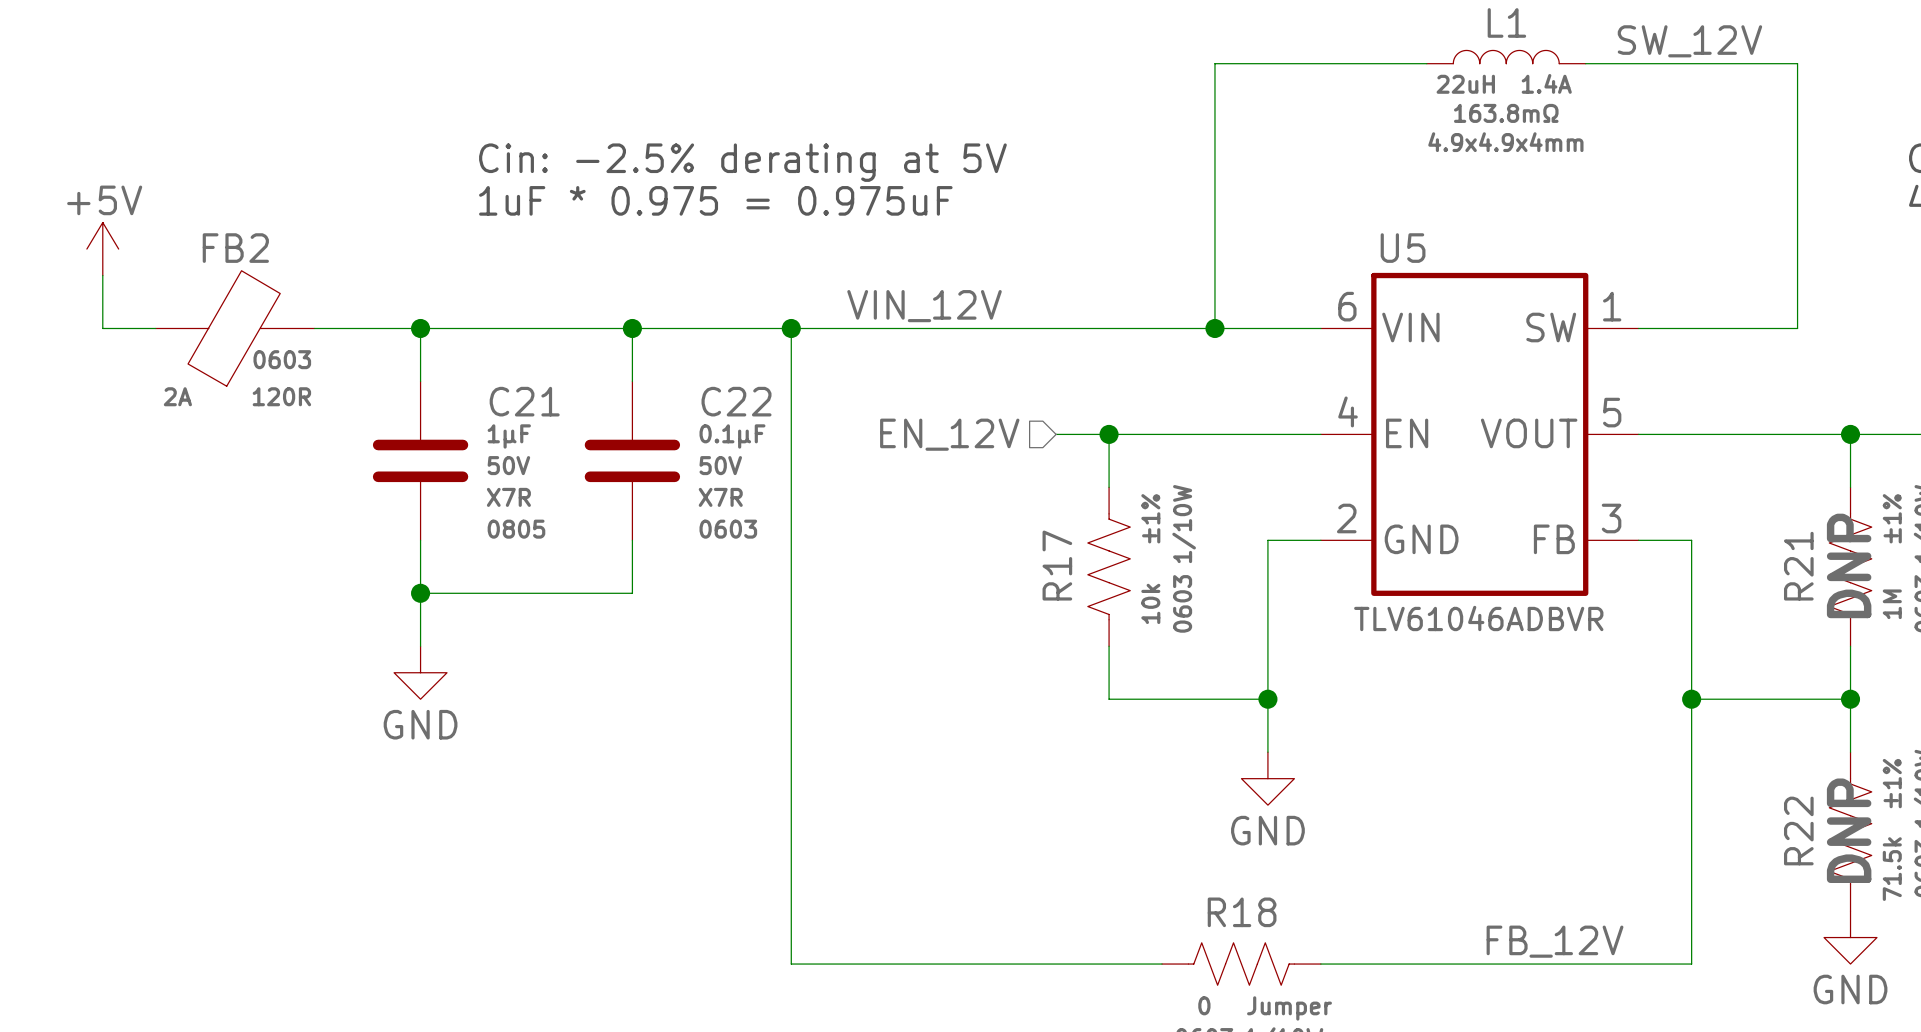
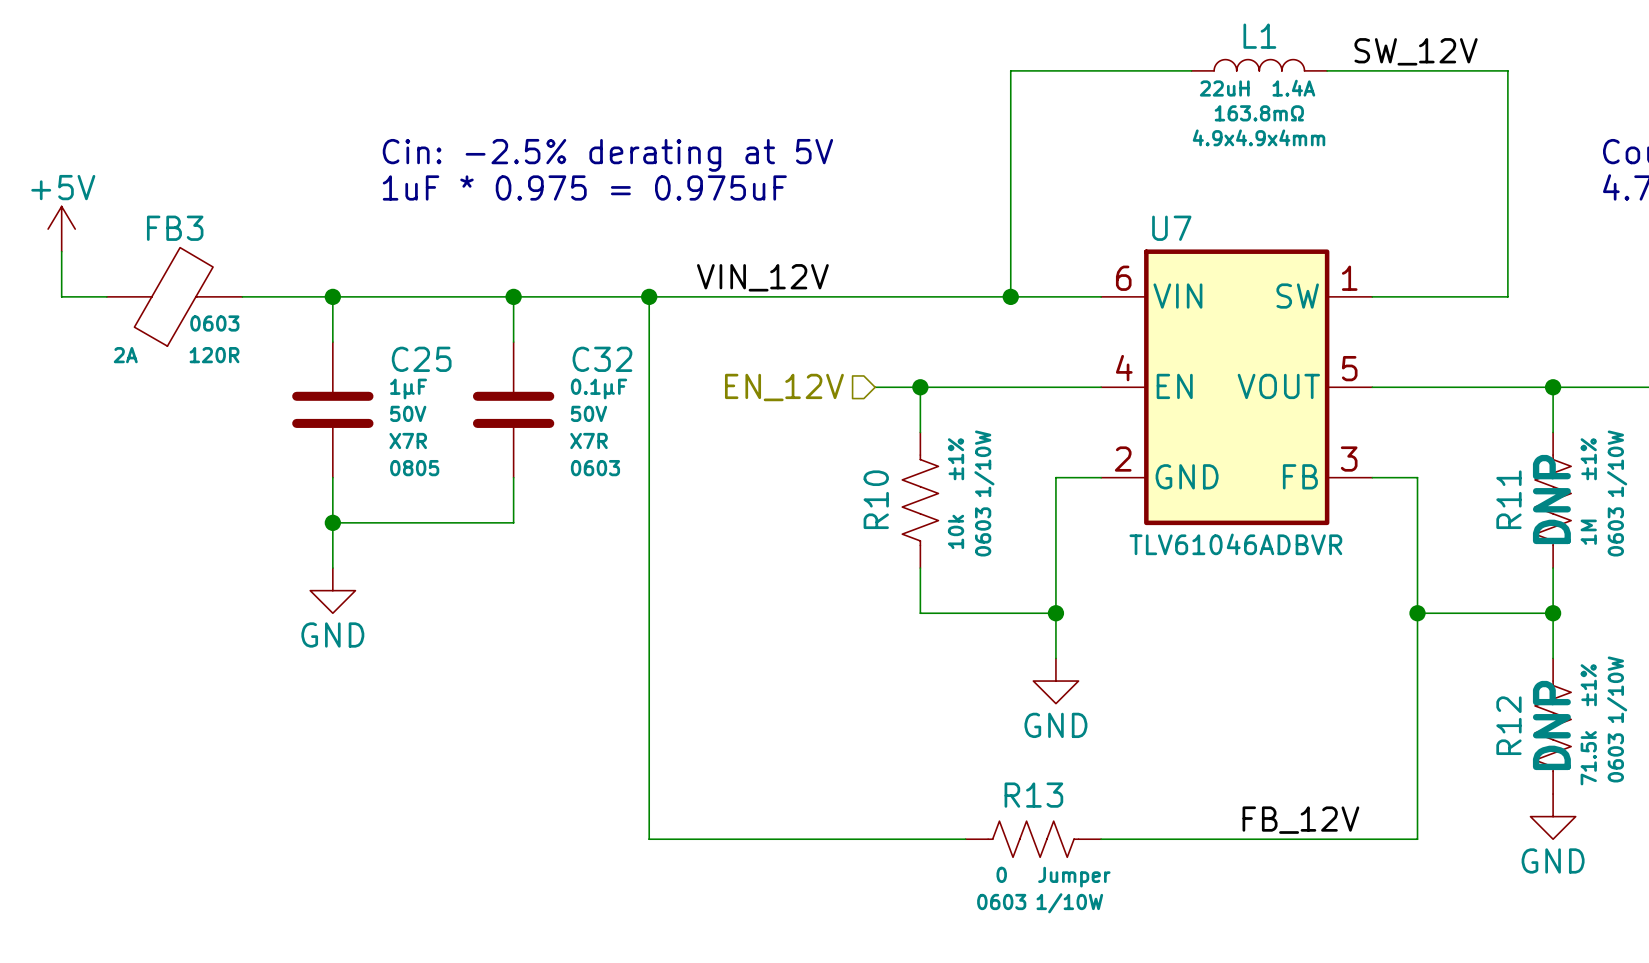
FB2 name: FB2 (235, 248) -> FB3 (175, 228)
U5 name: U5 (1403, 248) -> U7 (1171, 228)
C21 name: C21 (524, 401) -> C25 (421, 359)
C22 name: C22 (736, 401) -> C32 (602, 359)
R17 name: R17 (1057, 565) -> R10 (876, 499)
R21 name: R21 (1798, 566) -> R11 (1508, 499)
R22 name: R22 (1798, 830) -> R12 (1508, 725)
R18 name: R18 (1242, 912) -> R13 (1033, 795)

